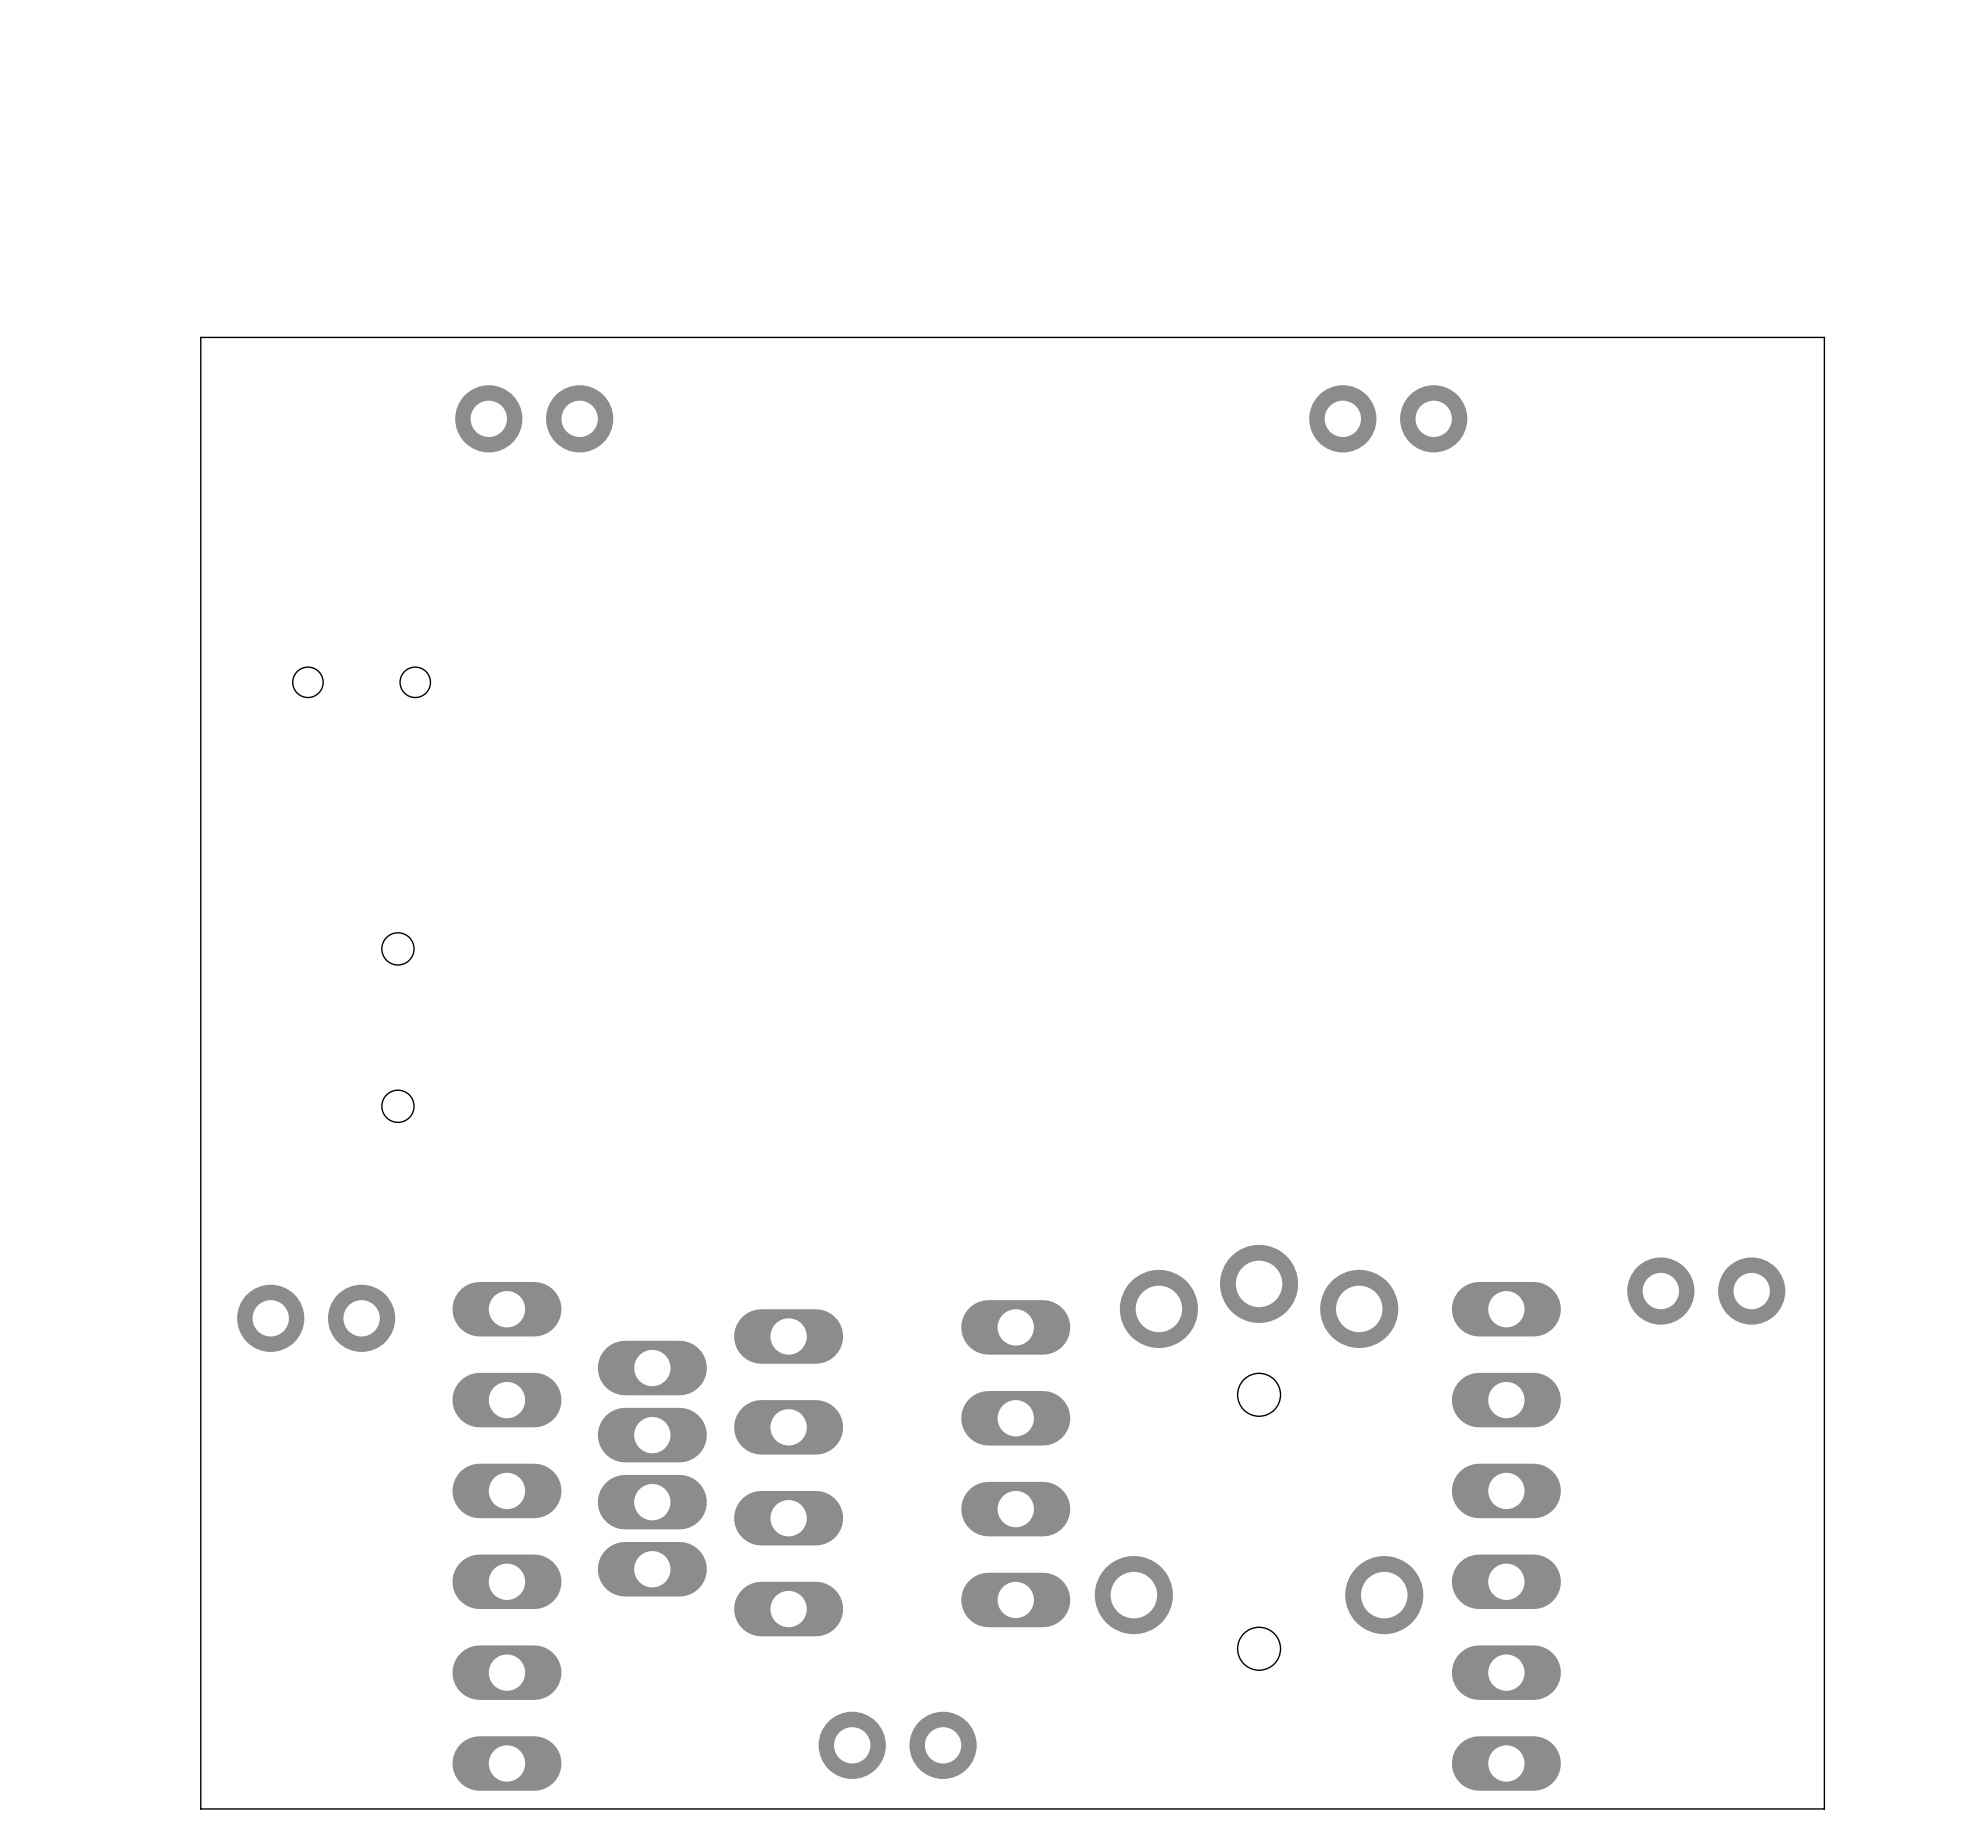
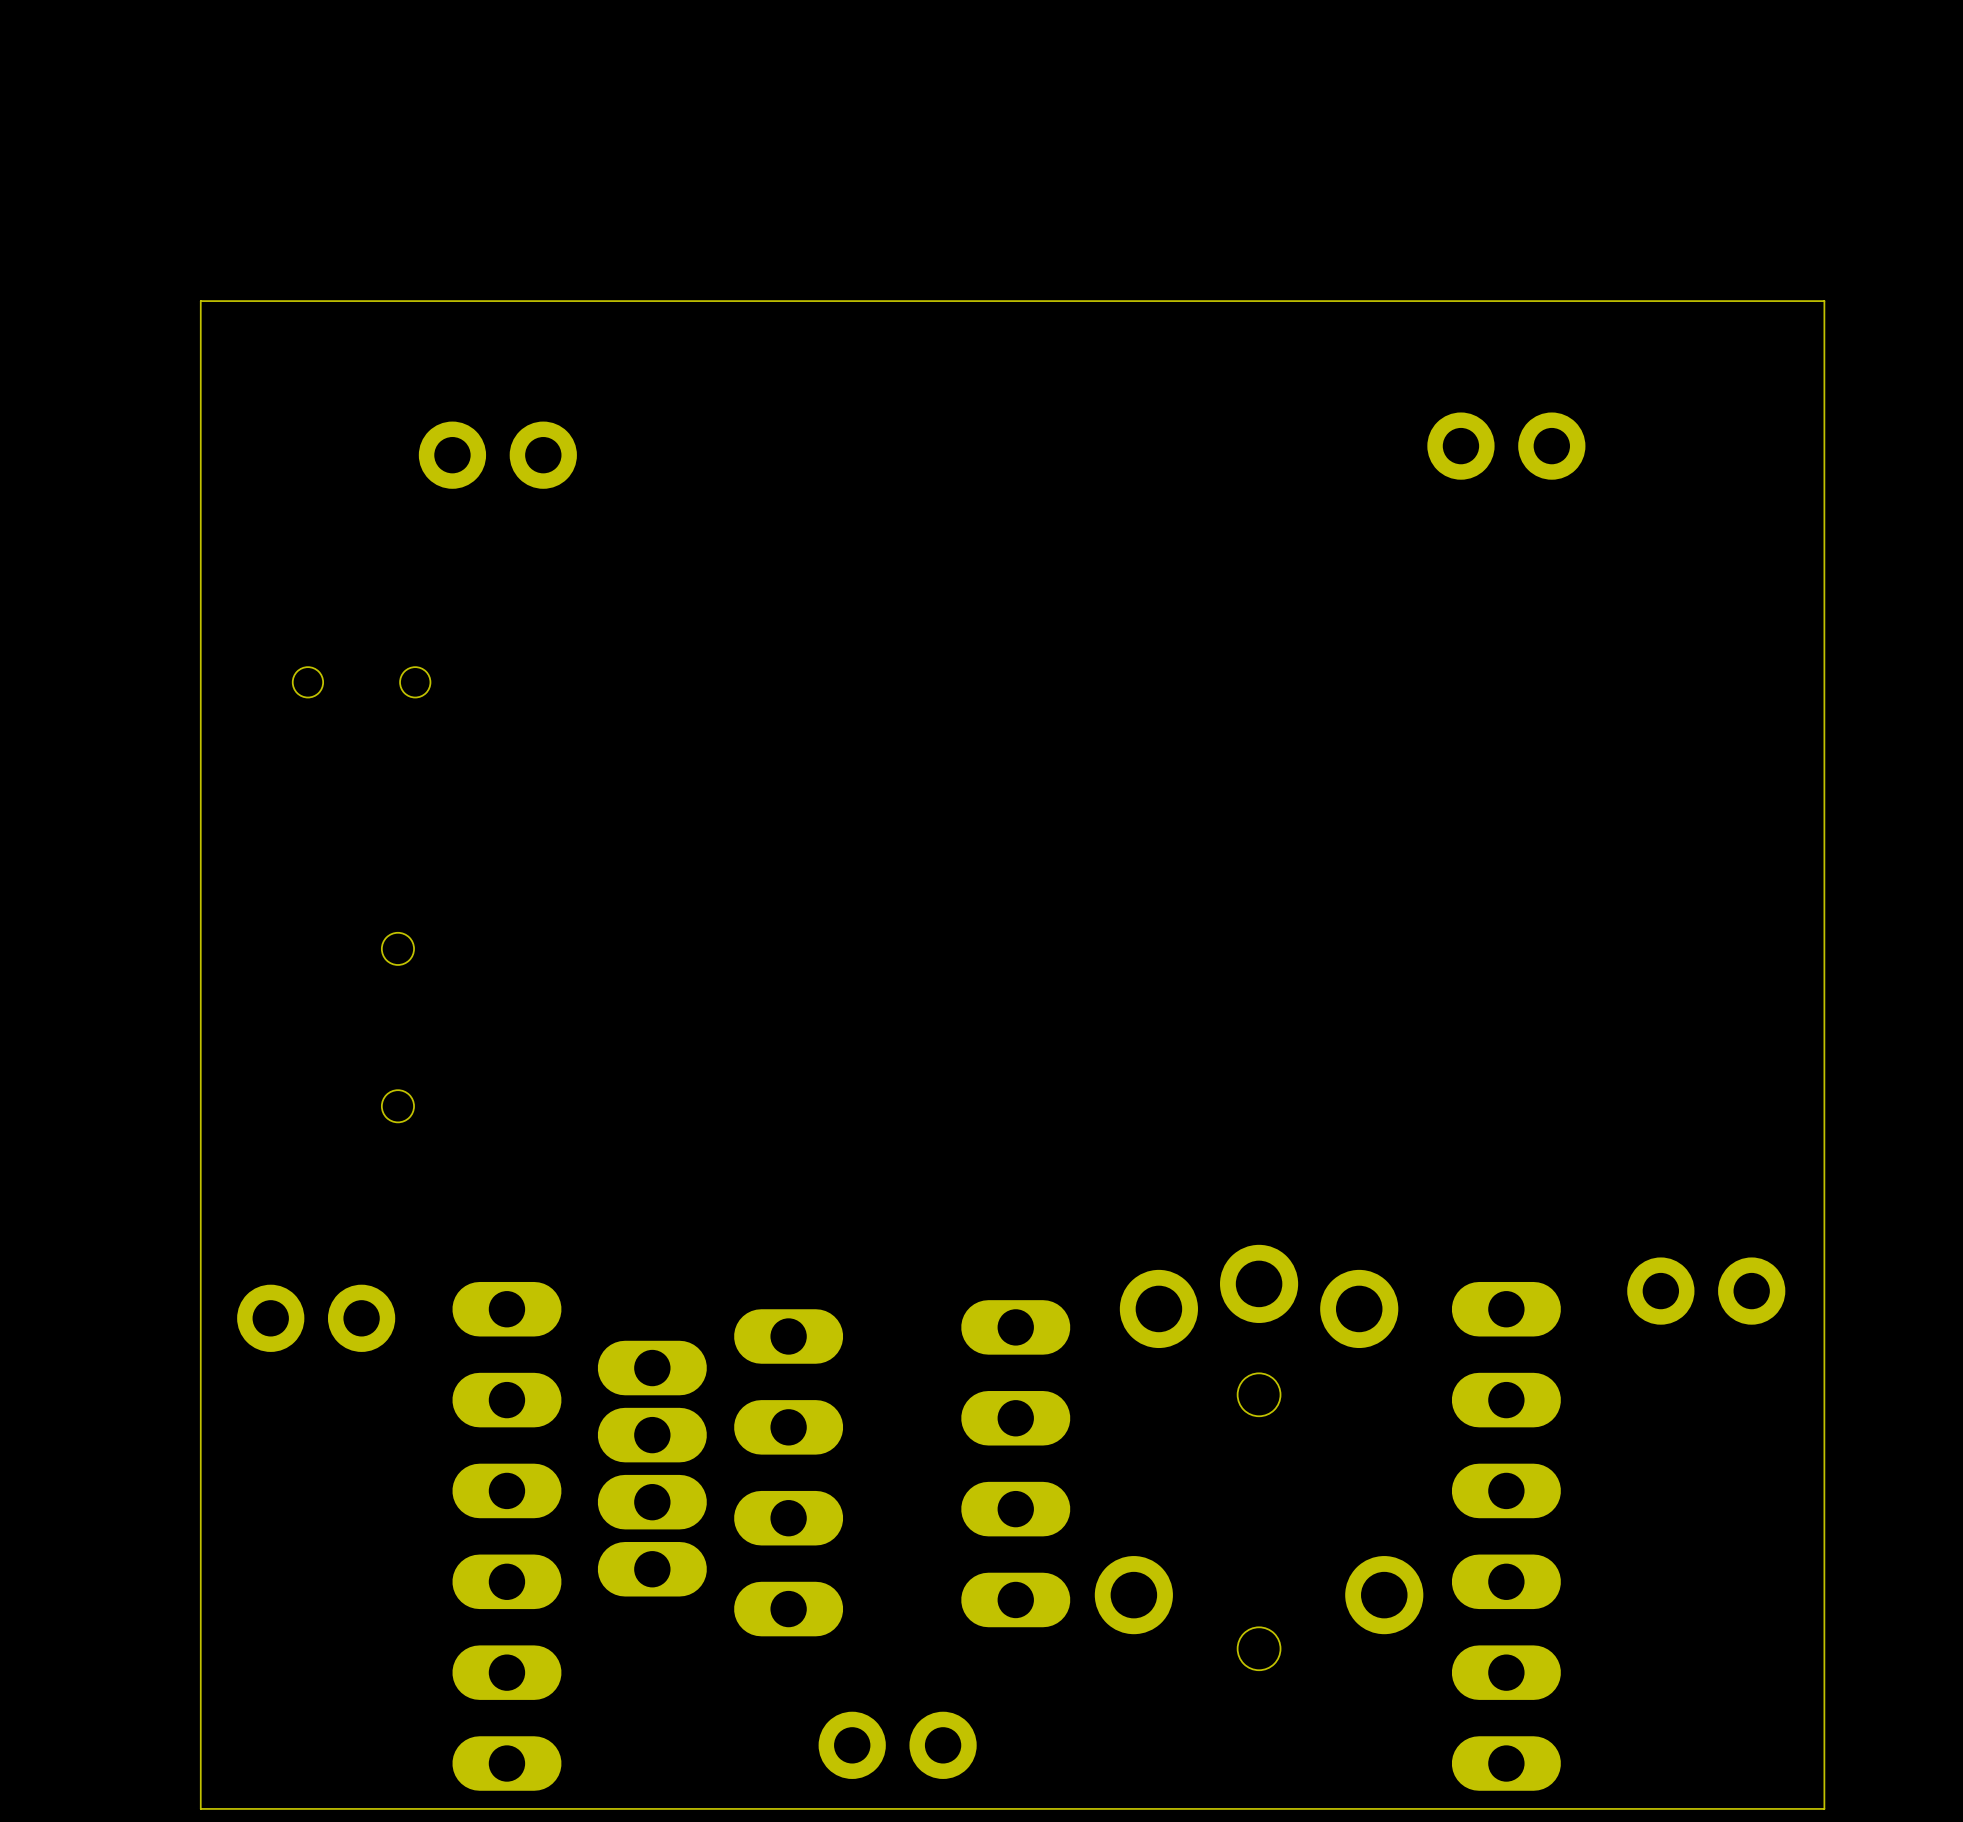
board edge: (1824, 337) (200, 337) -> (1824, 337) (1824, 301) (200, 301) (200, 337)
part position: (534, 418) -> (497, 455)
part position: (1388, 418) -> (1506, 446)

